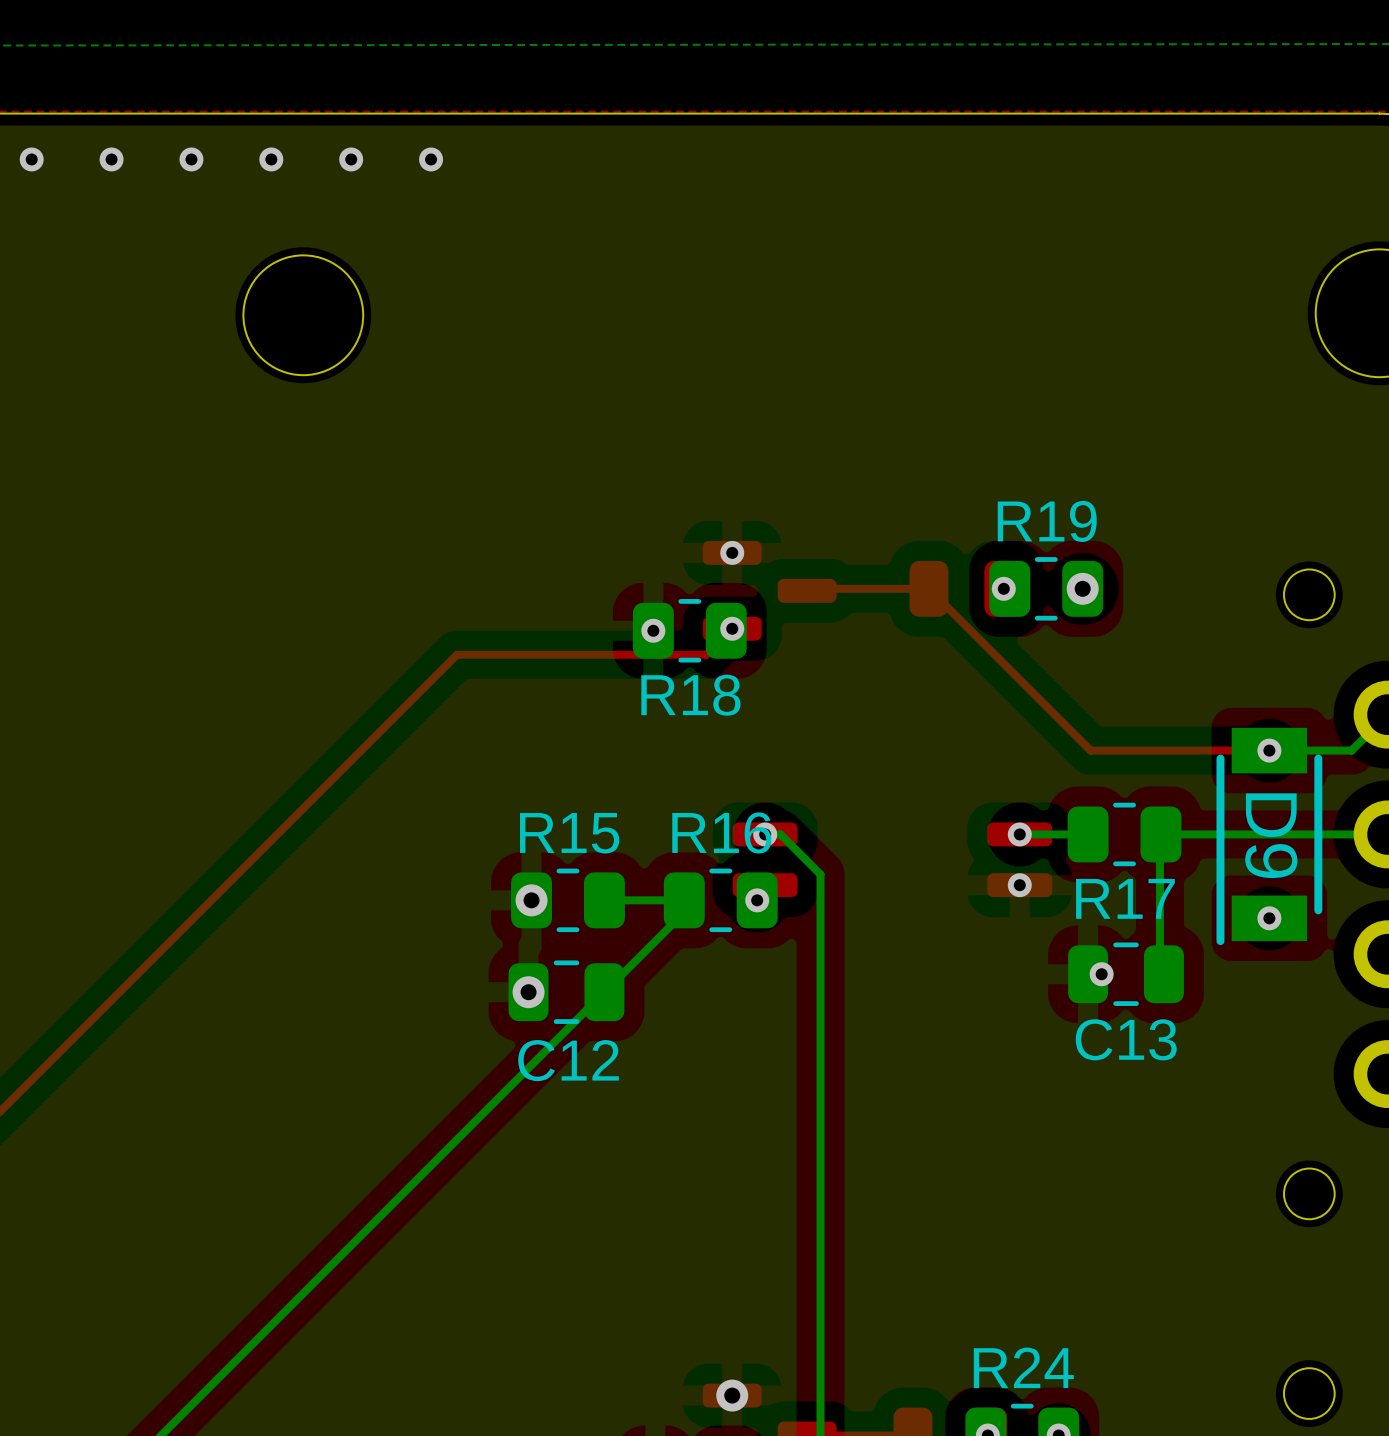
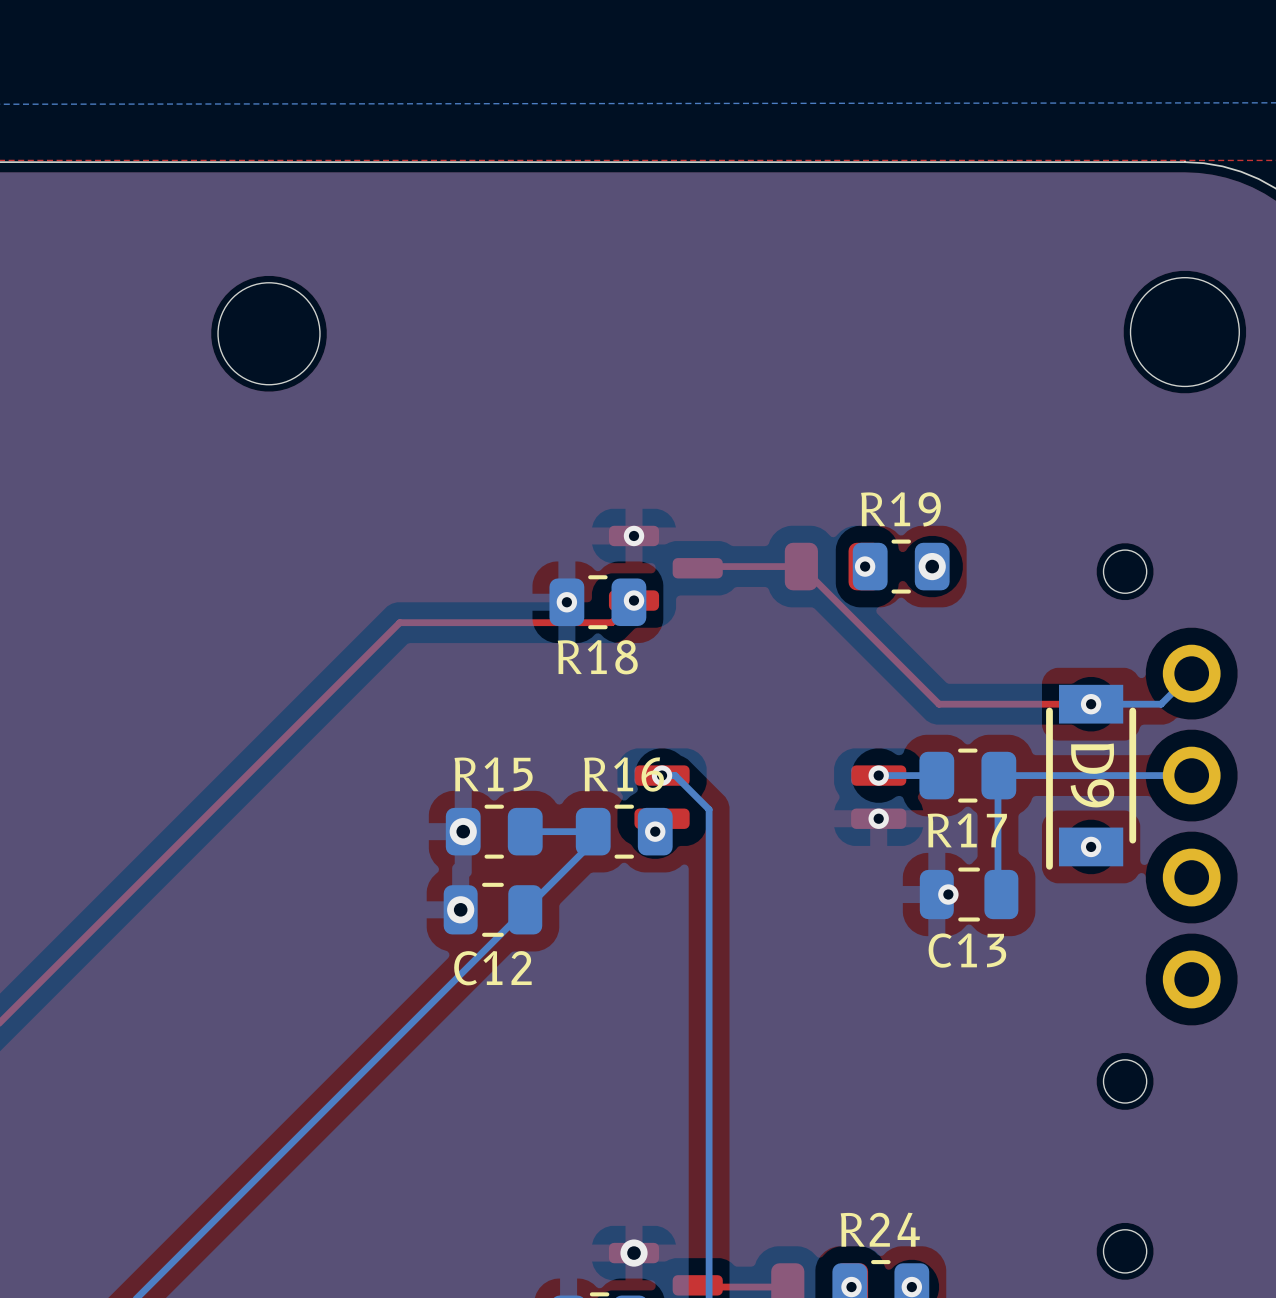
via: (31, 159) -> none
via: (111, 159) -> none
via: (191, 159) -> none
via: (271, 159) -> none
via: (351, 159) -> none
via: (431, 159) -> none

